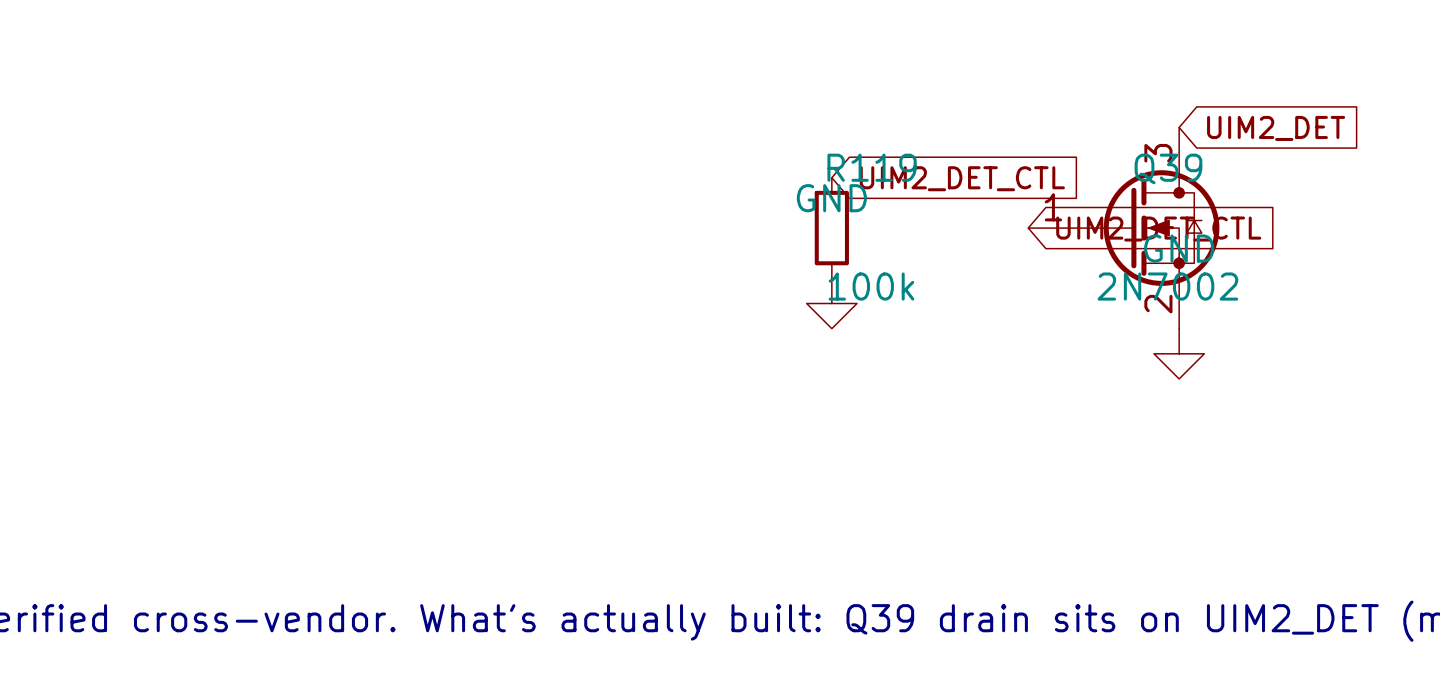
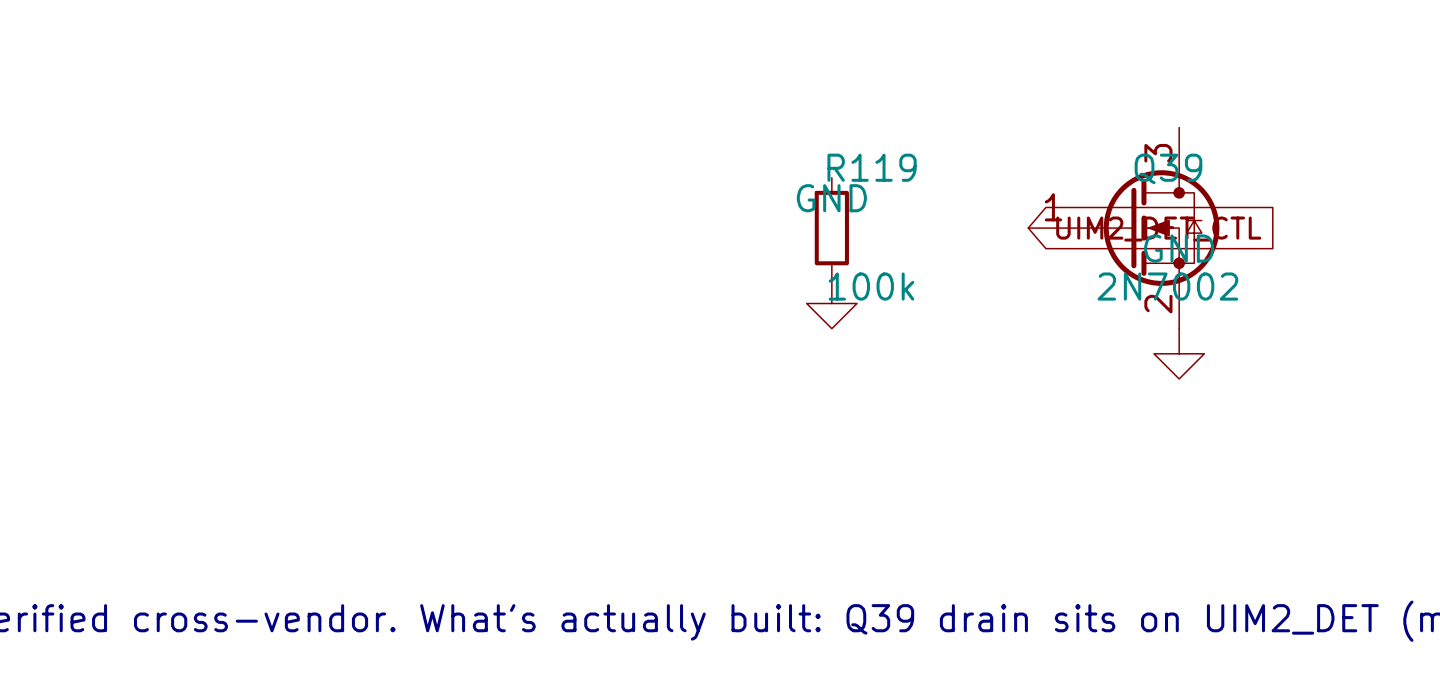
global label: UIM2_DET (1276, 128) -> none
global label: UIM2_DET_CTL (962, 178) -> none

